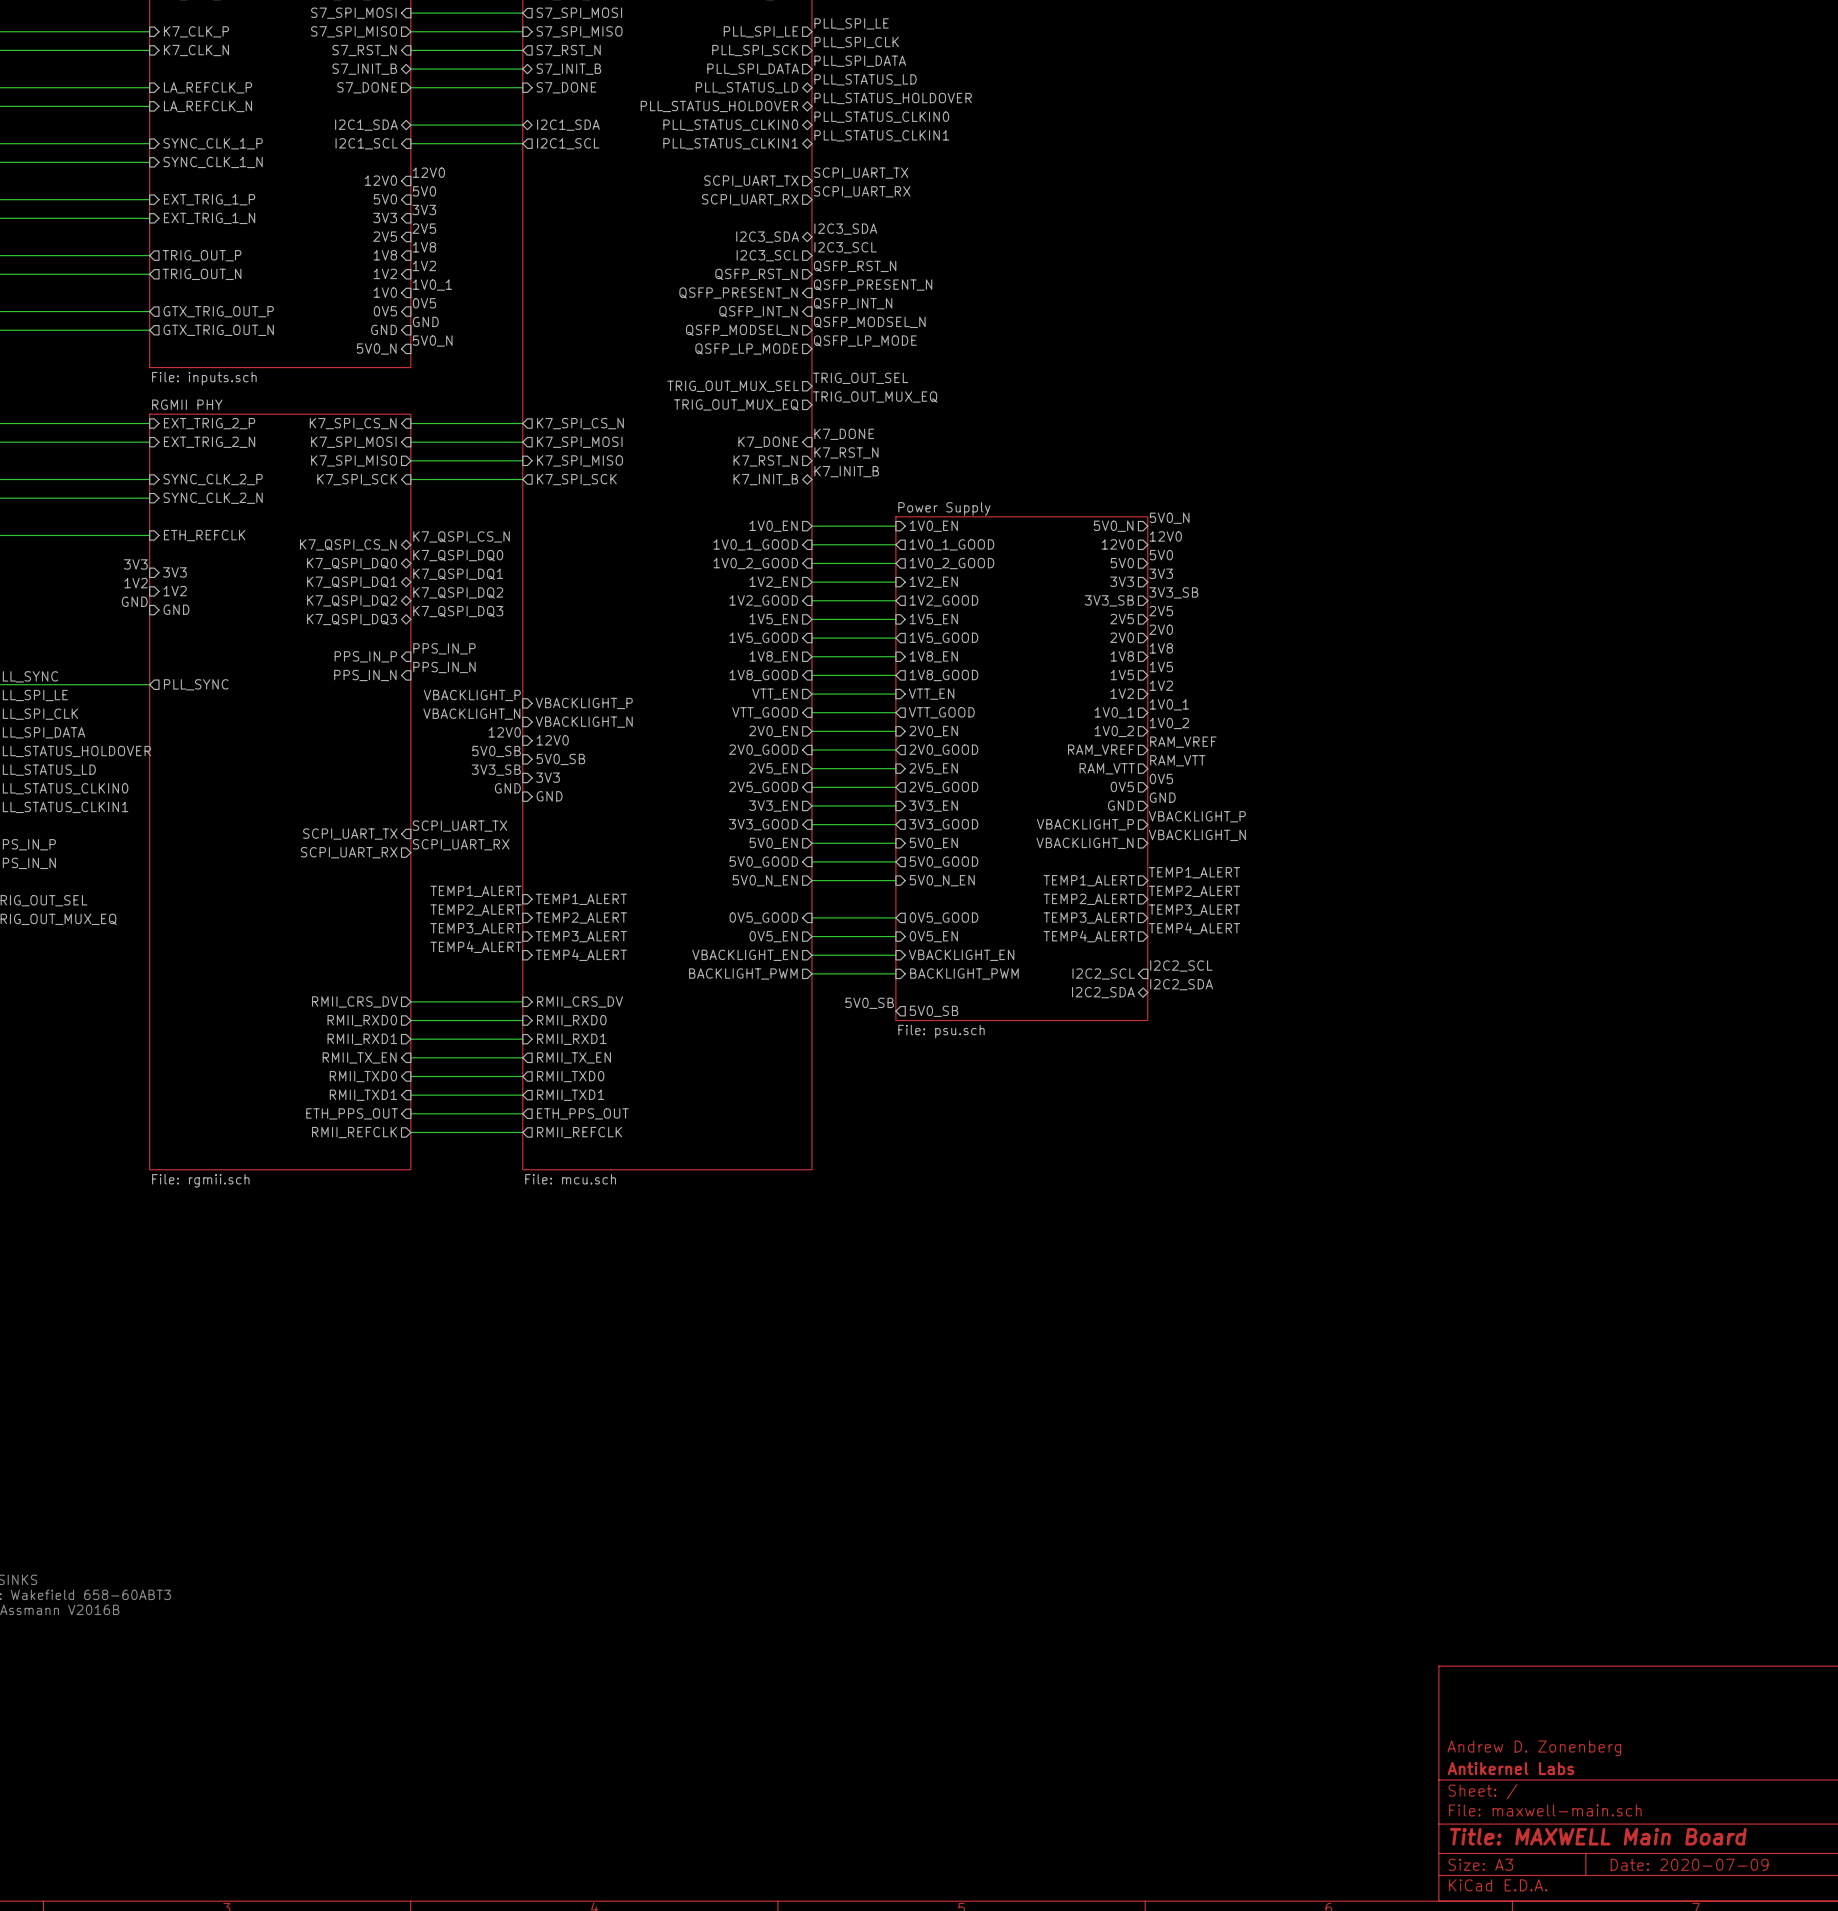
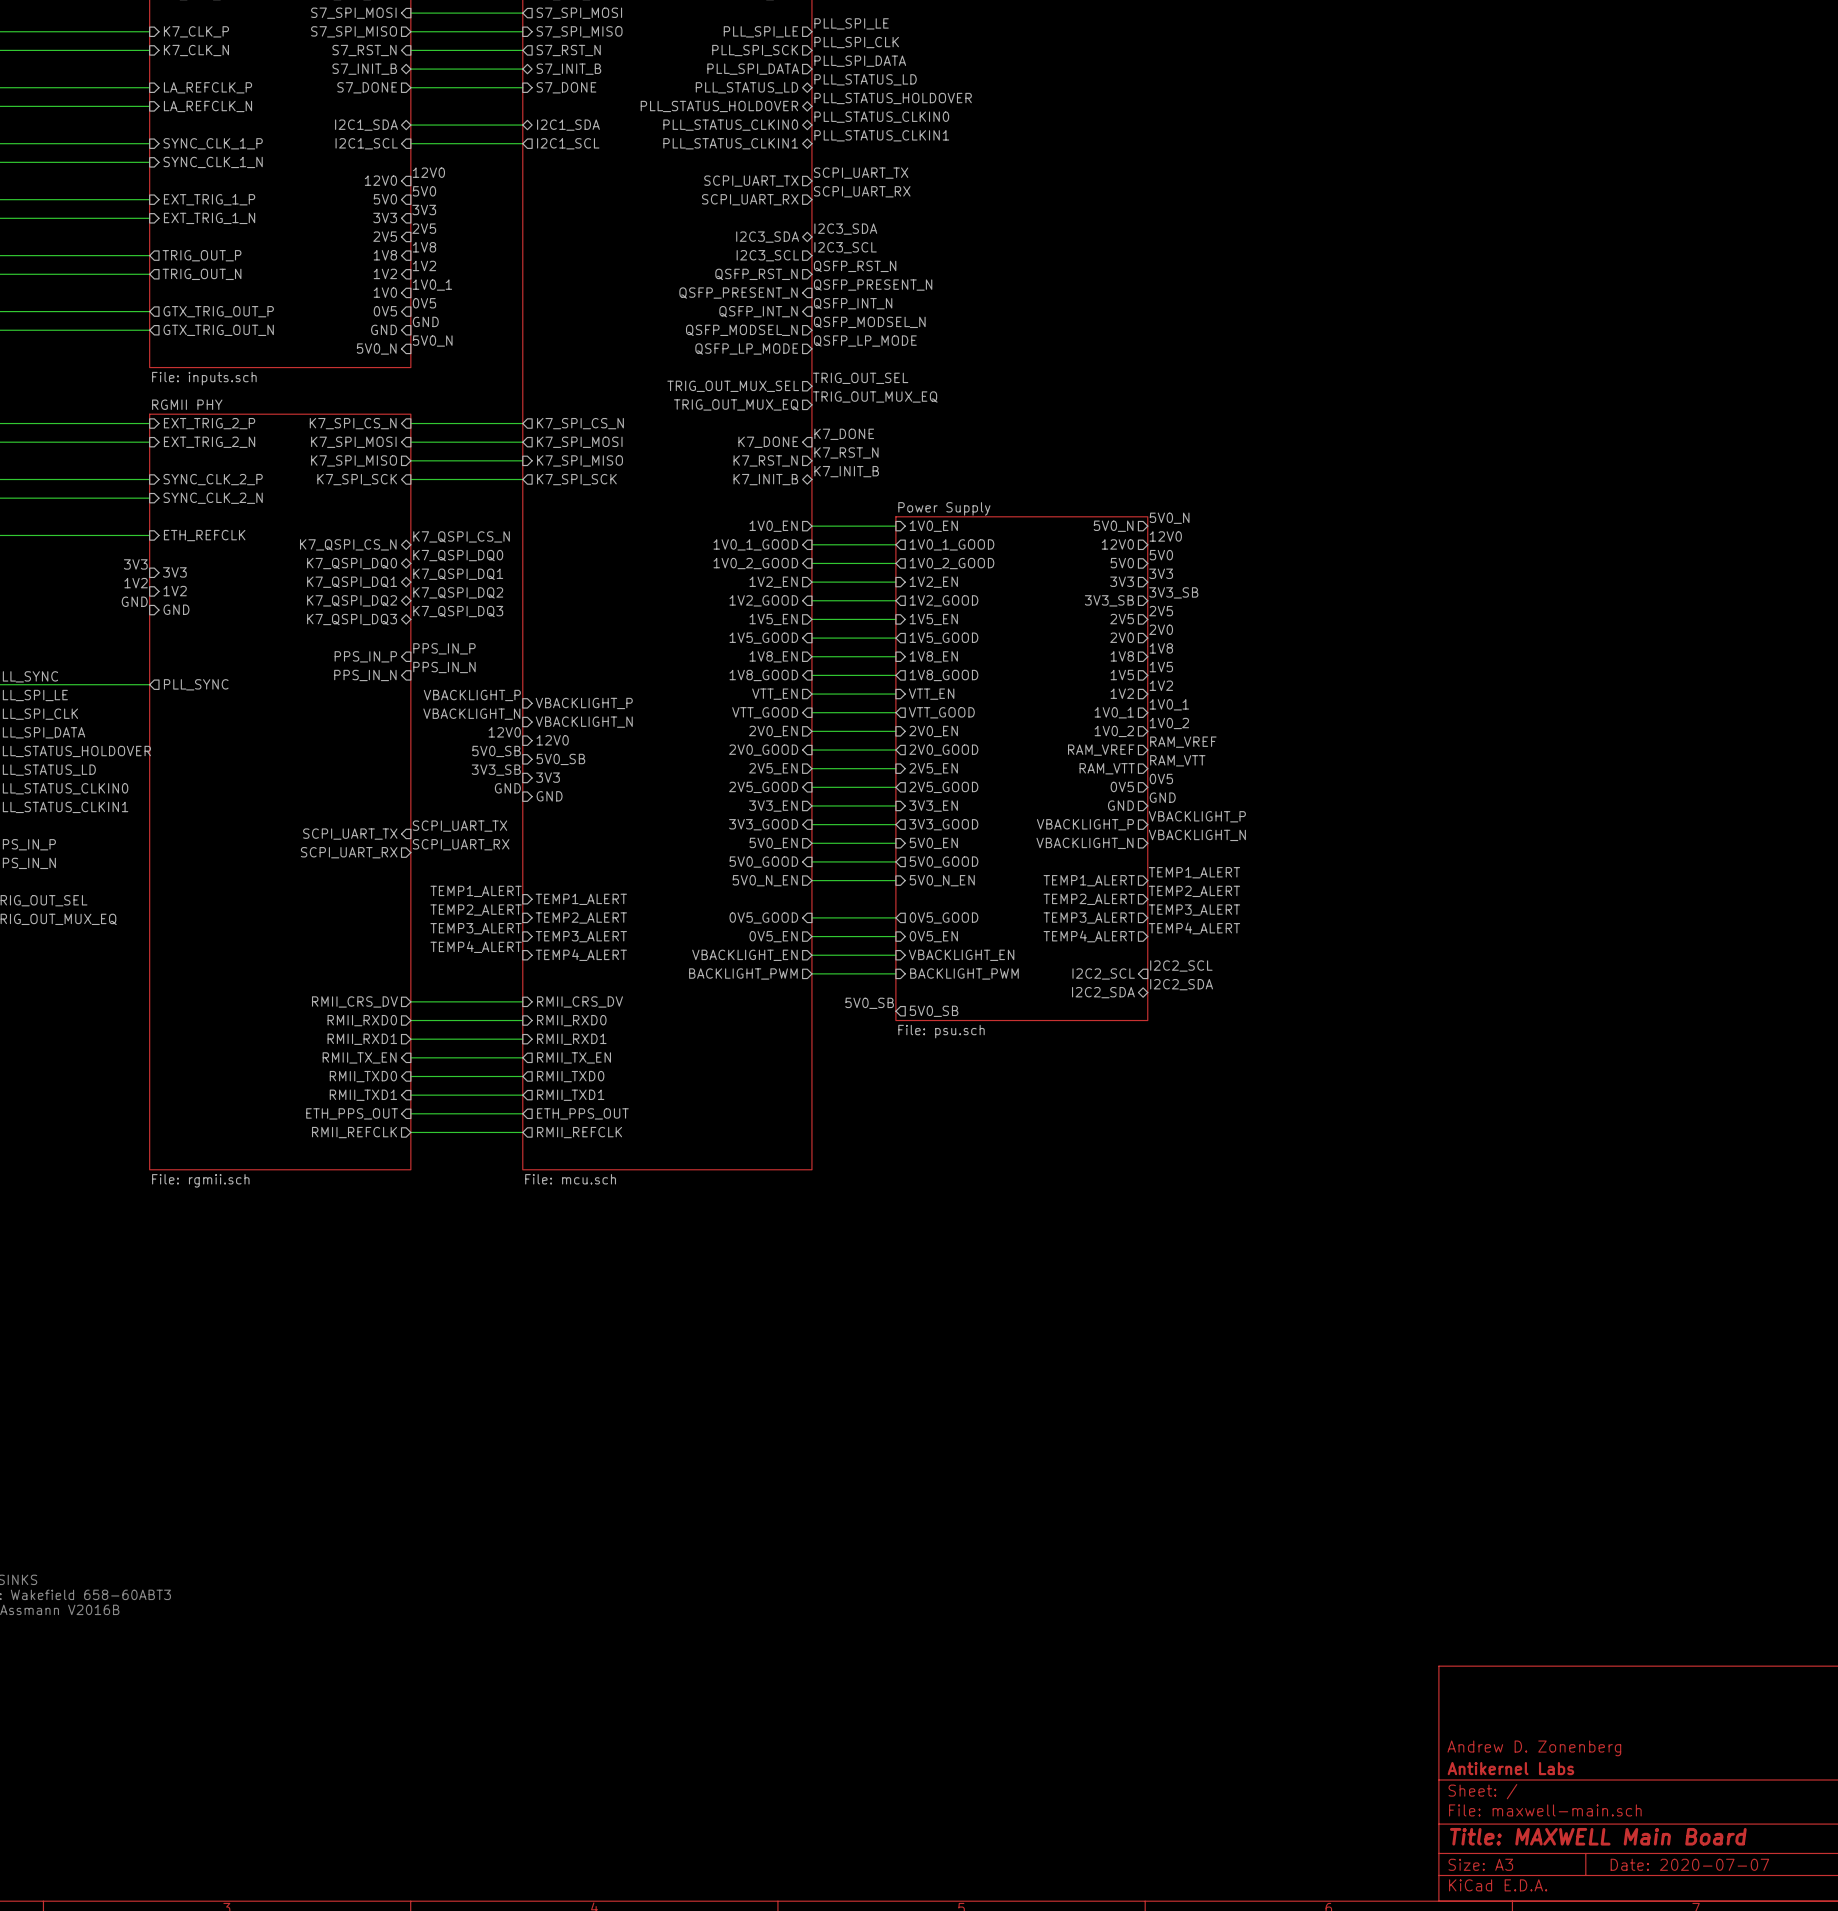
title block: Date: 2020-07-09 (1689, 1864) -> Date: 2020-07-07 (1689, 1864)

